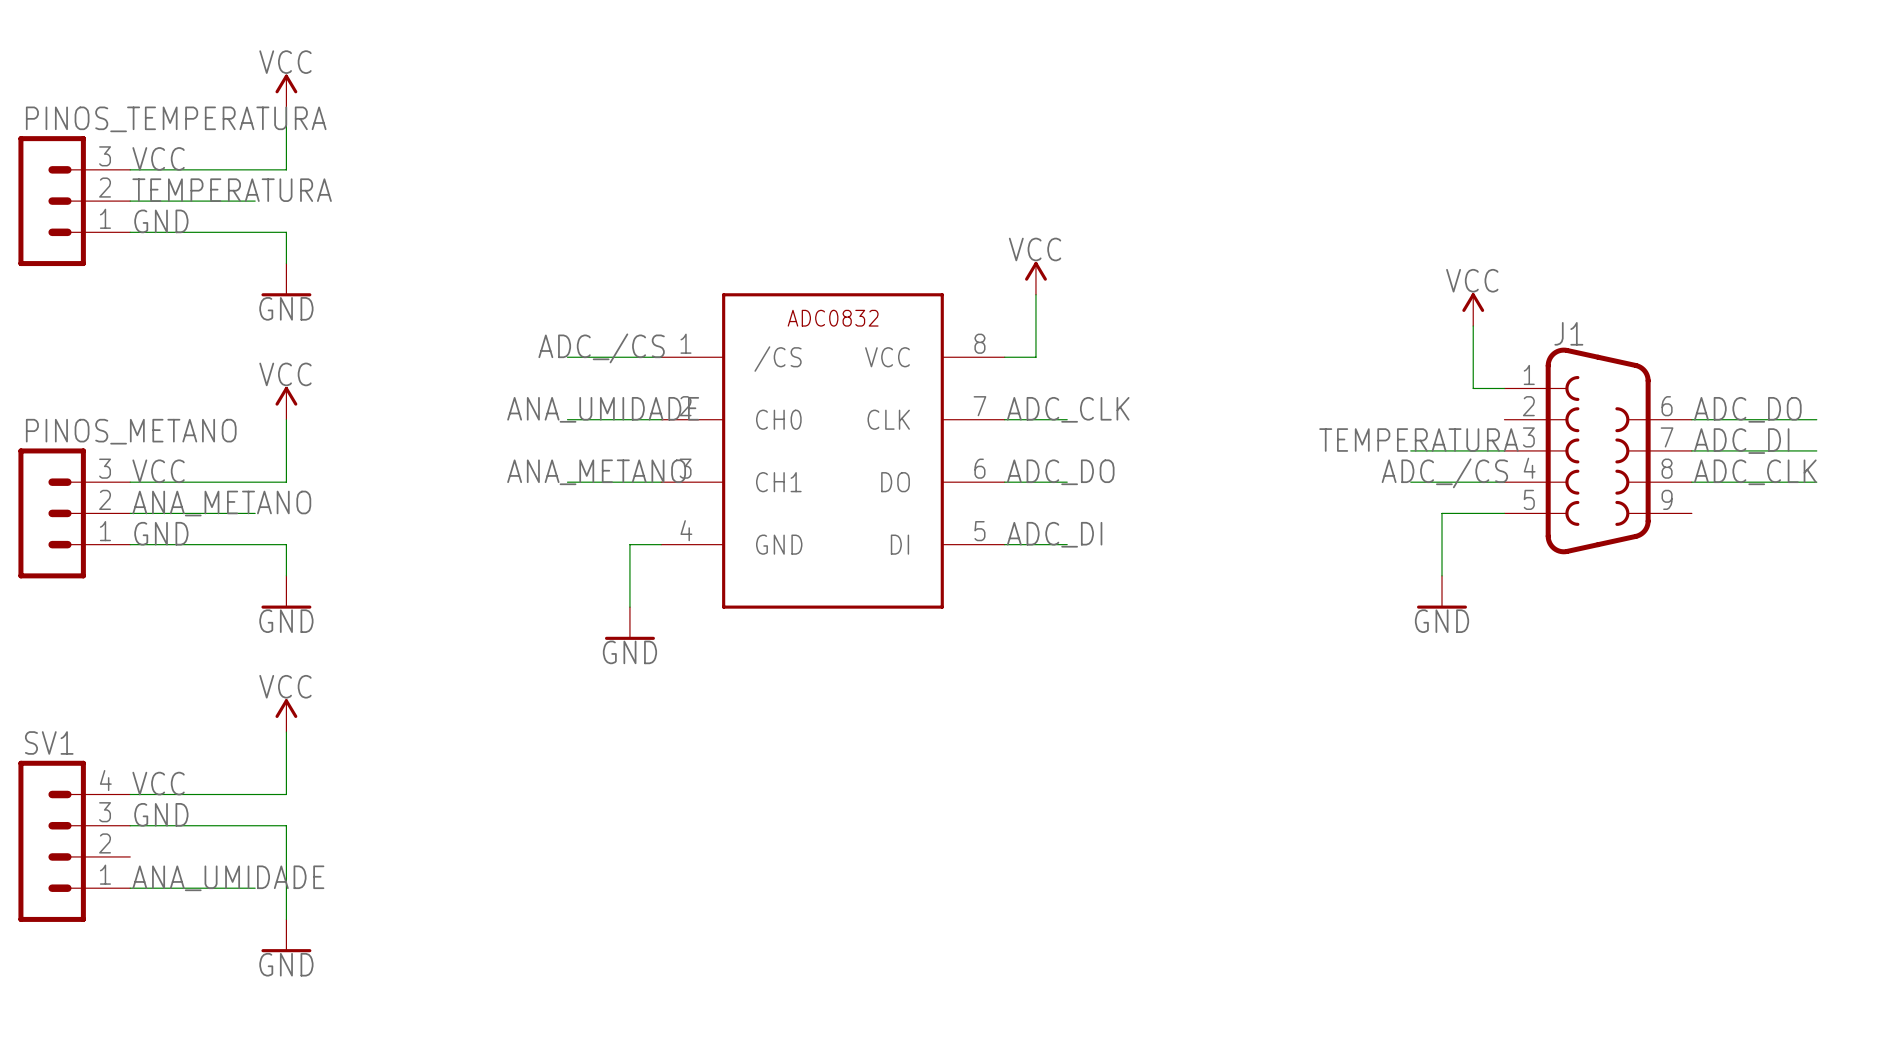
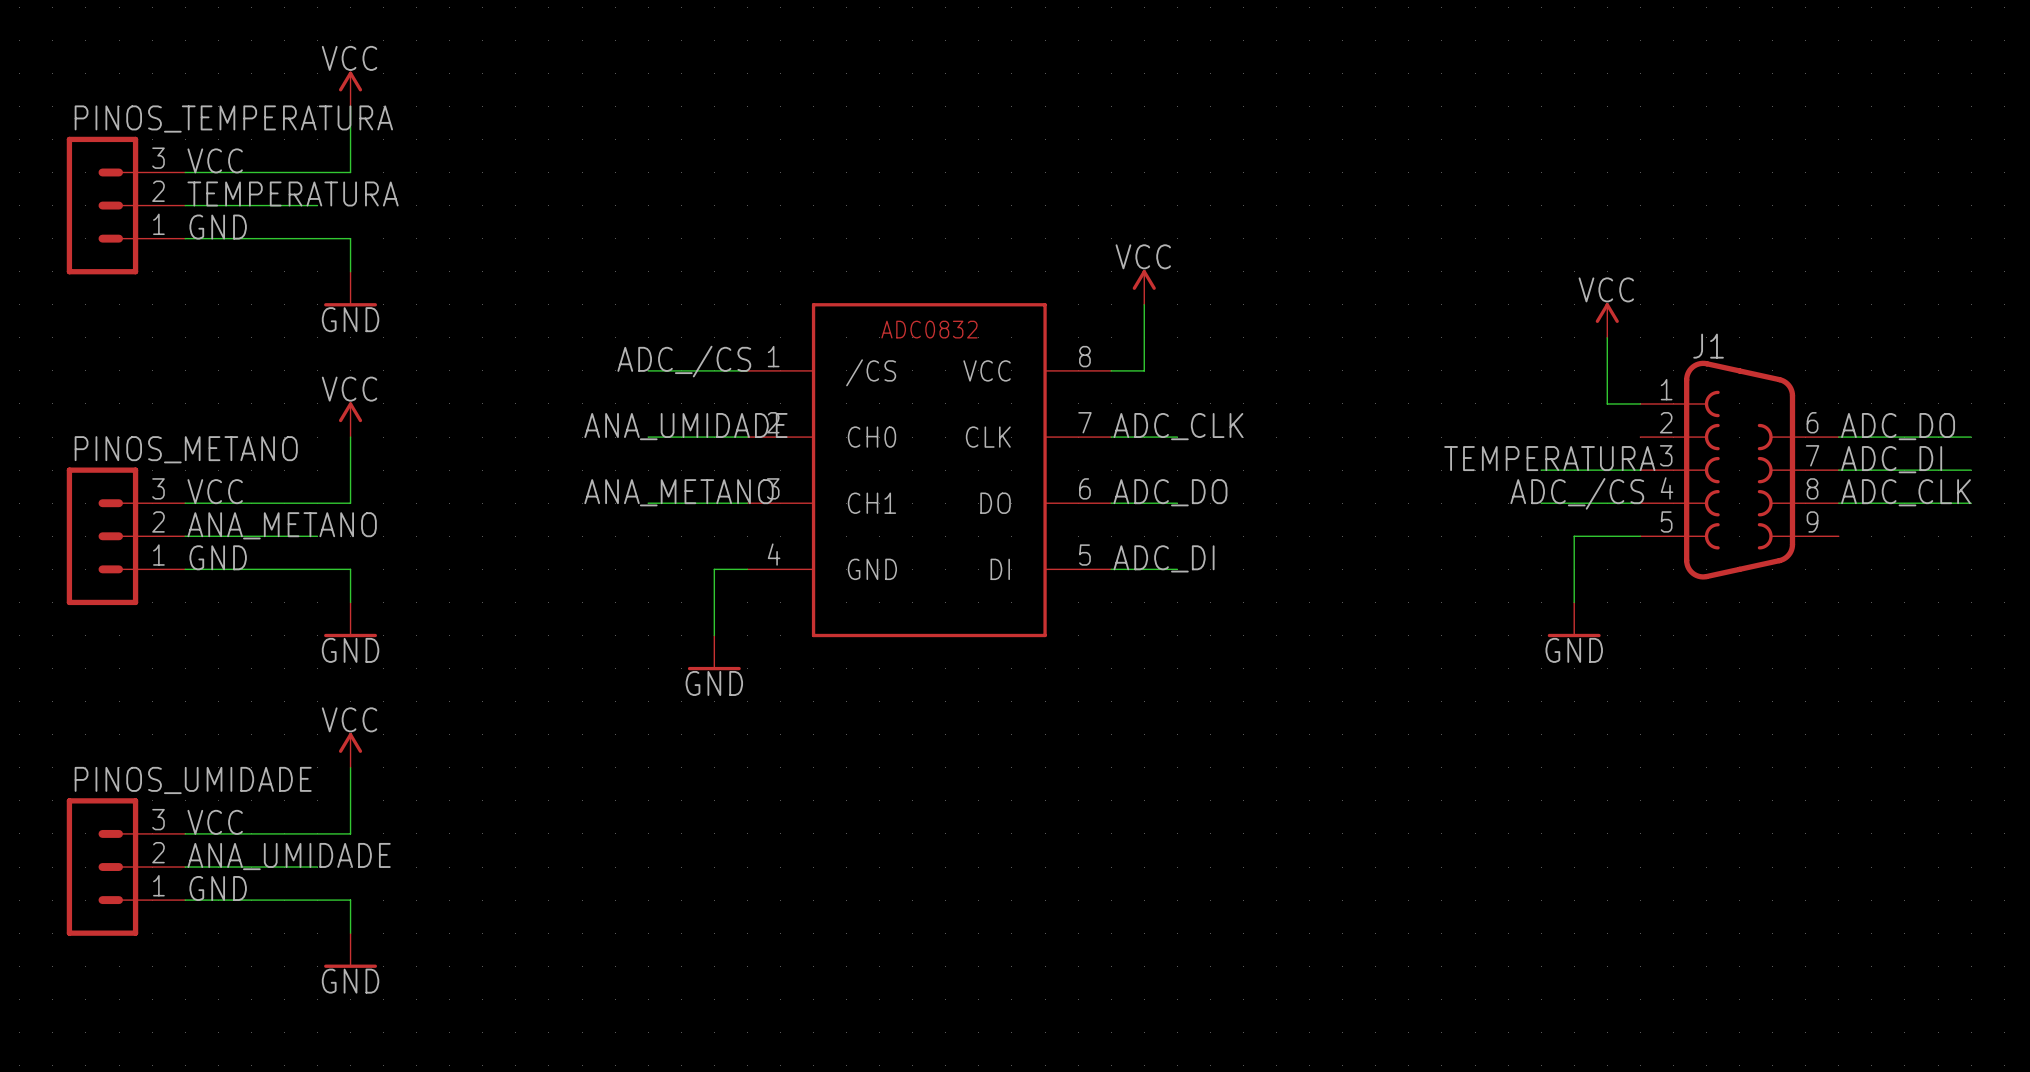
label: GND (161, 814) -> ANA_UMIDADE (289, 856)
PINOS_UMIDADE: none -> (125, 867)
wire: (255, 825) (286, 825) (286, 856) -> (185, 900) (350, 900)
SV1: (74, 841) -> none
label: none -> GND (218, 888)
label: ANA_UMIDADE (228, 878) -> none
wire: (130, 888) (255, 888) -> none
power symbol position: GND (286, 935) -> GND (350, 950)

